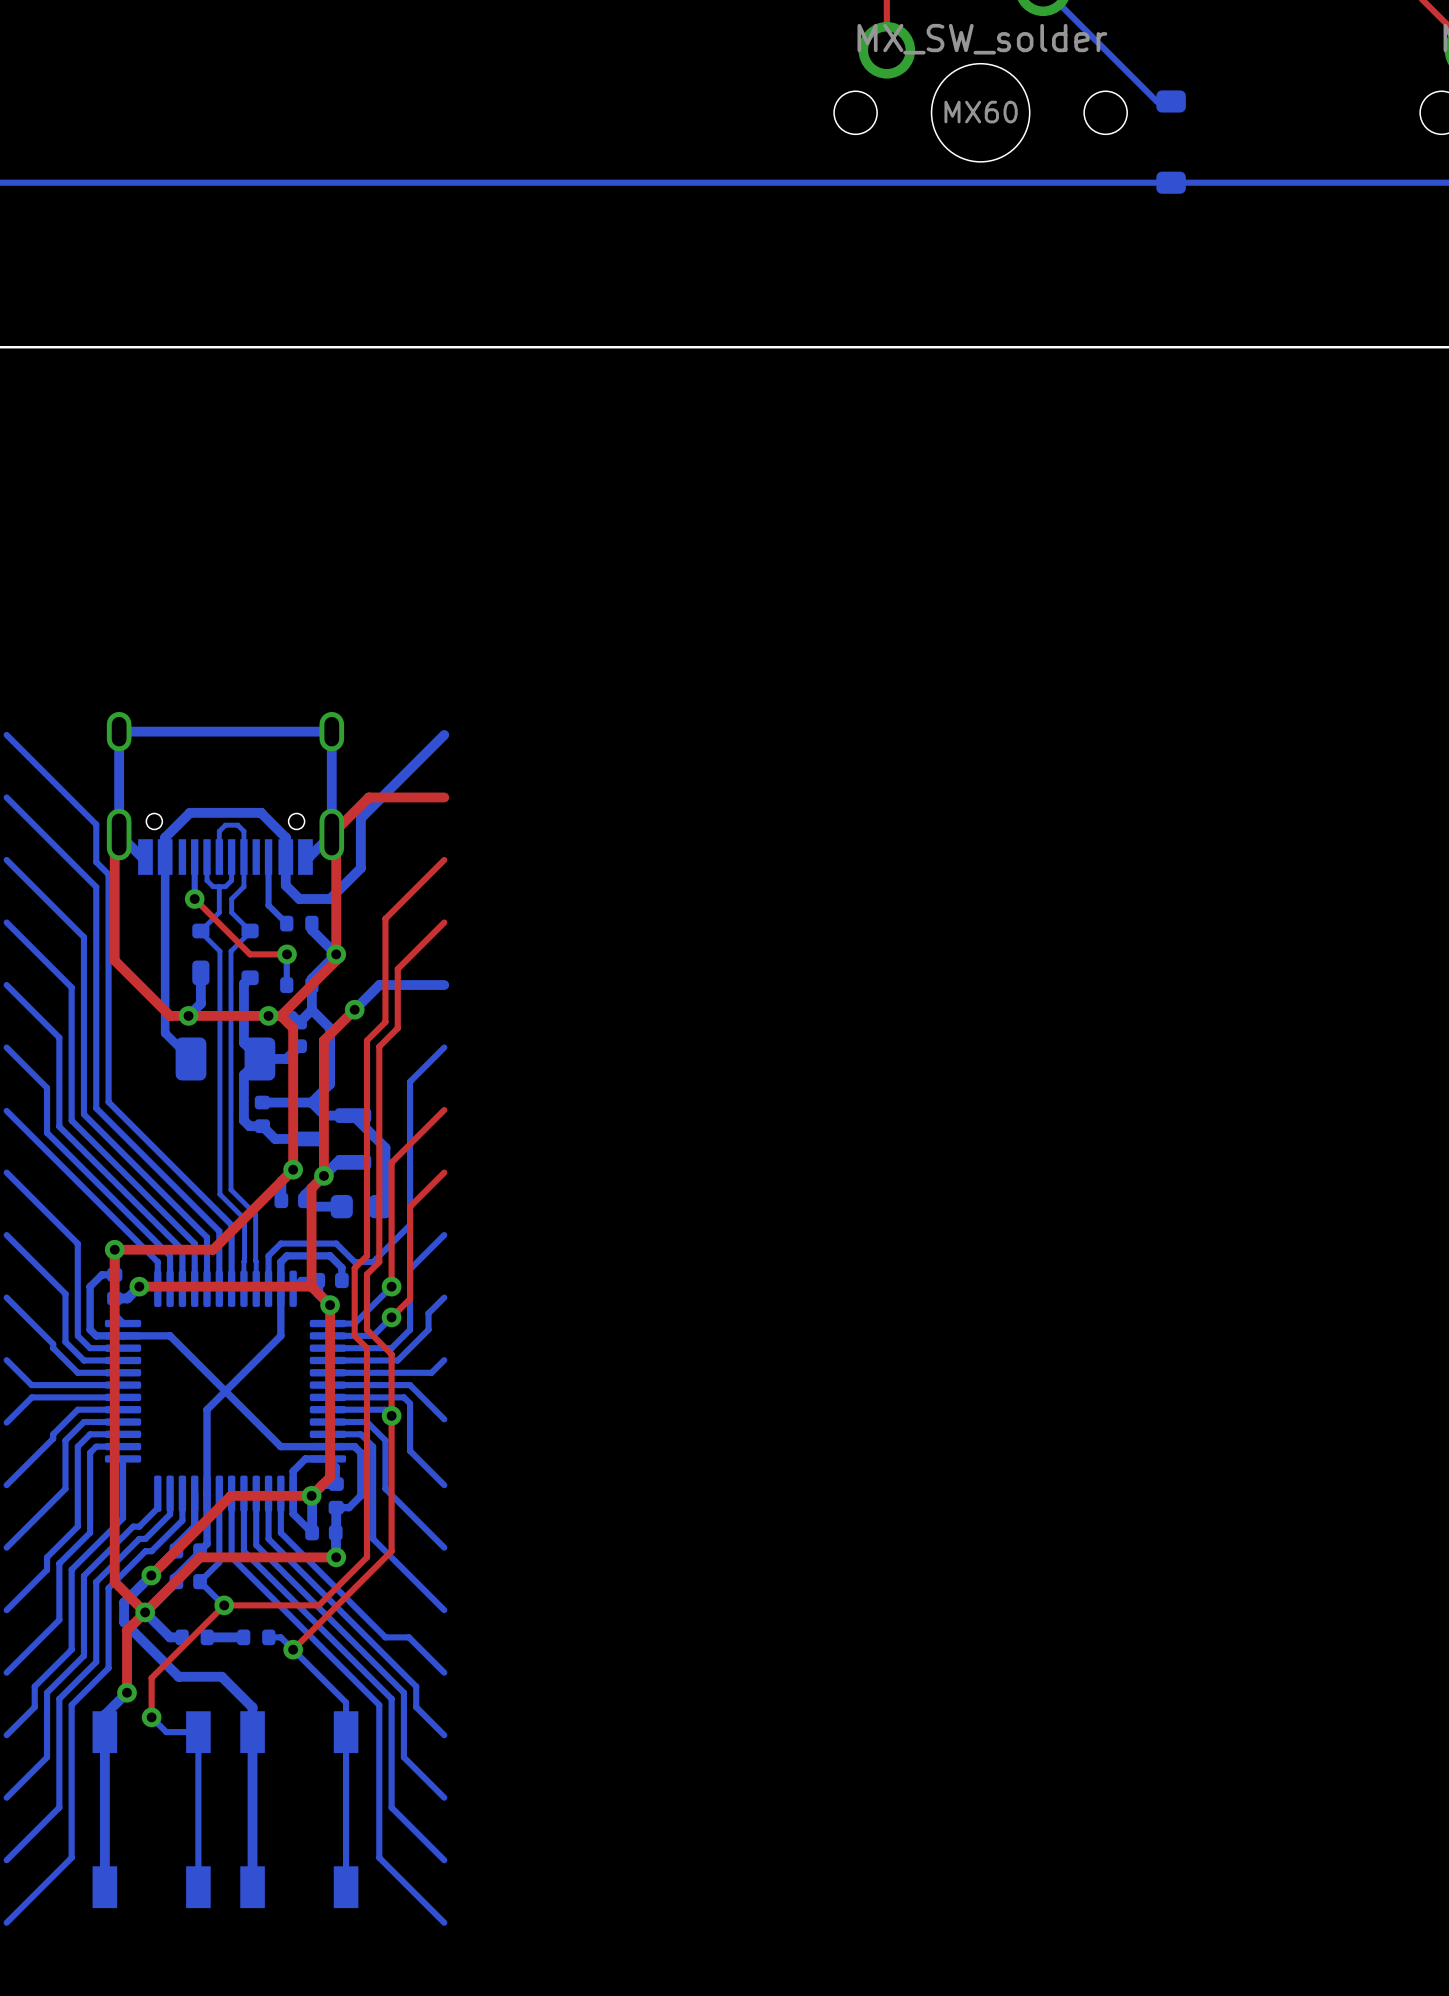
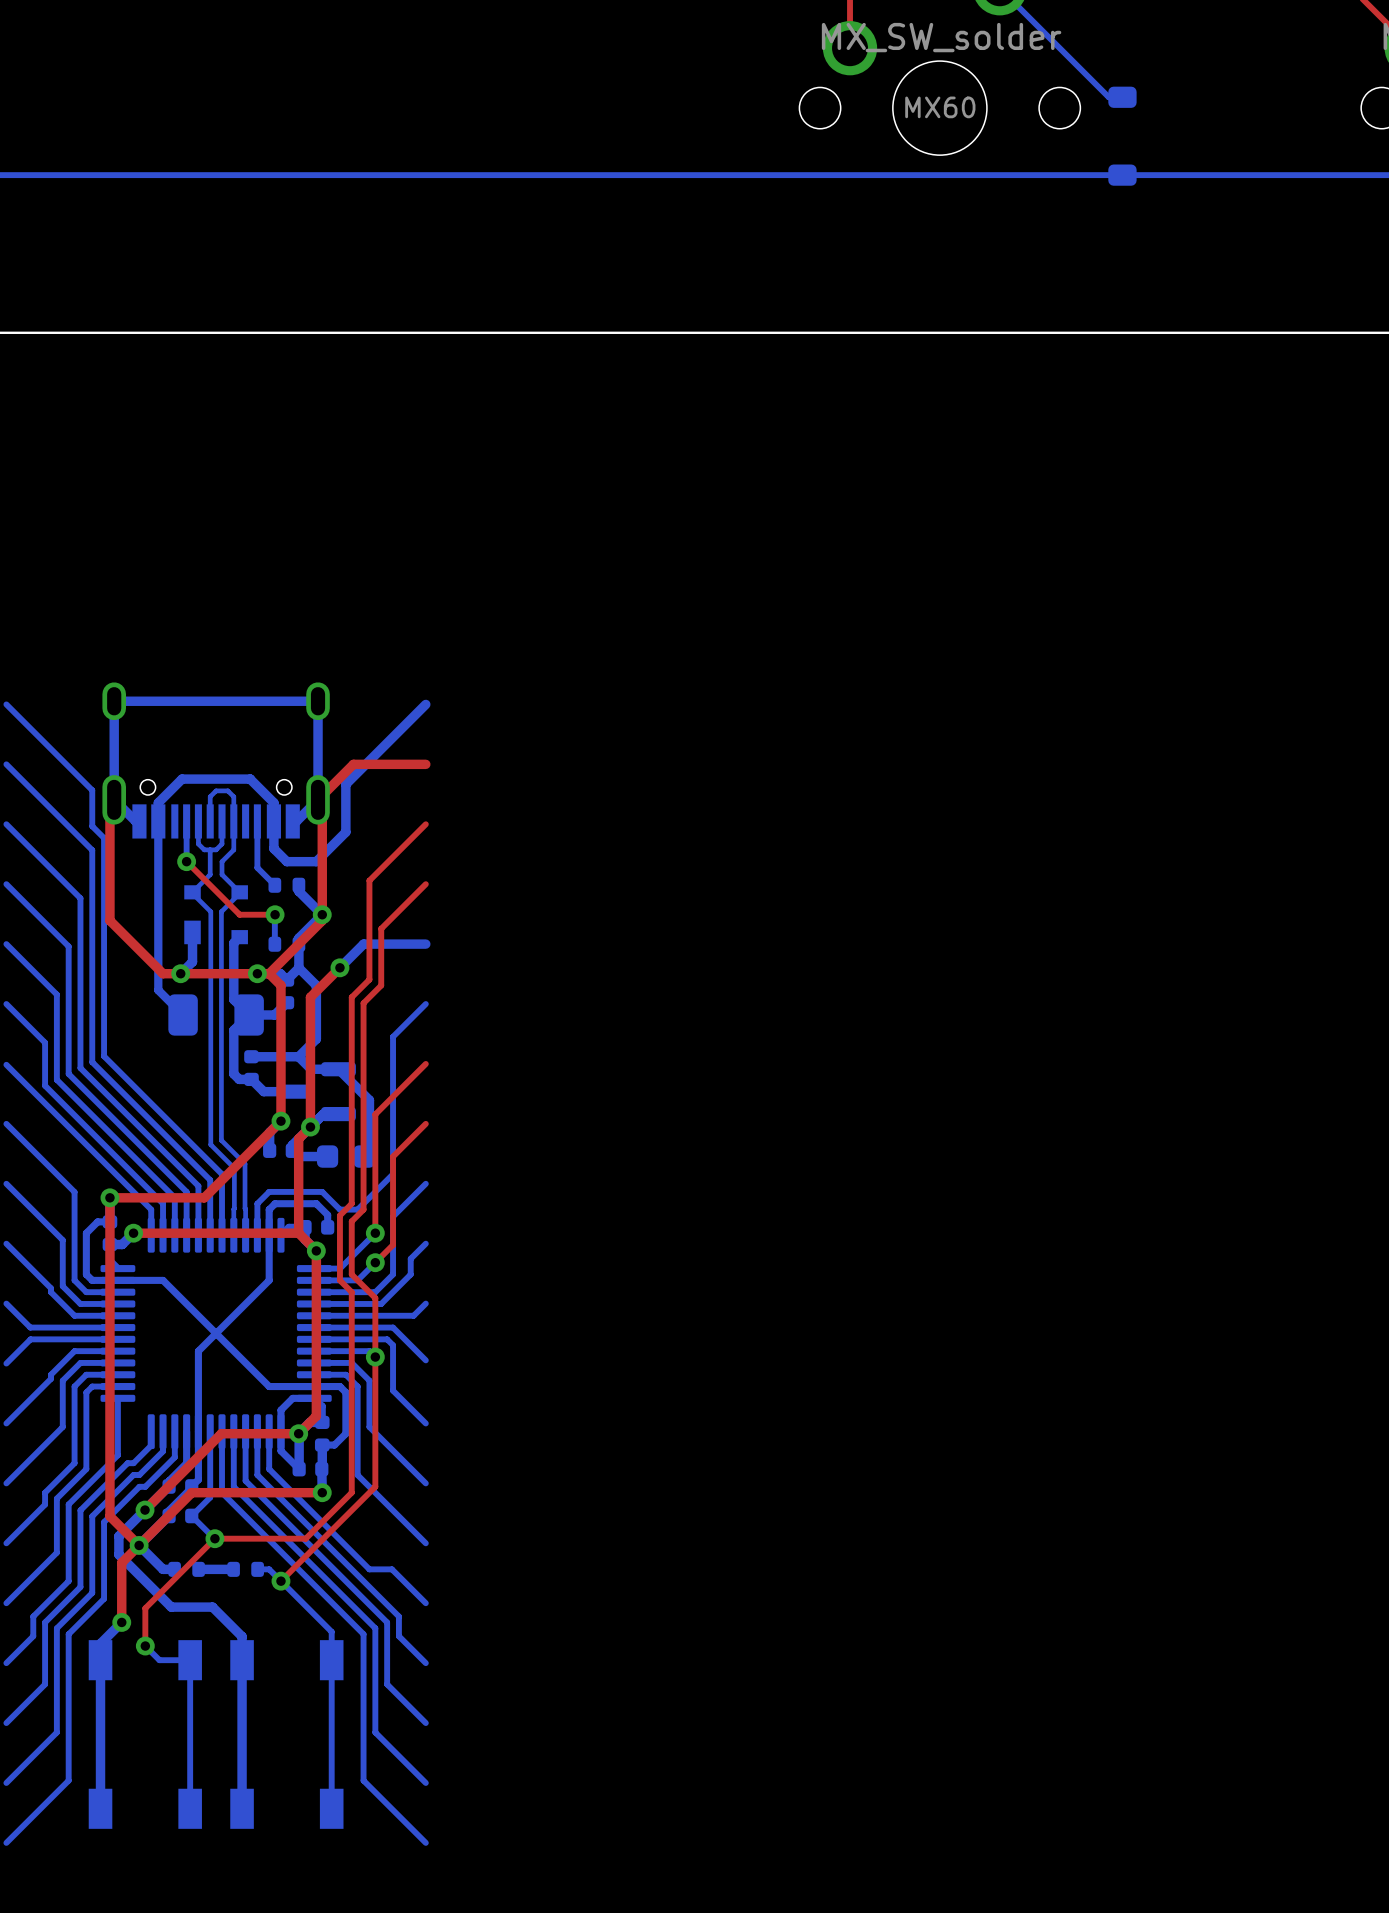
part footprint: [192, 923, 259, 986] -> [184, 885, 248, 945]

